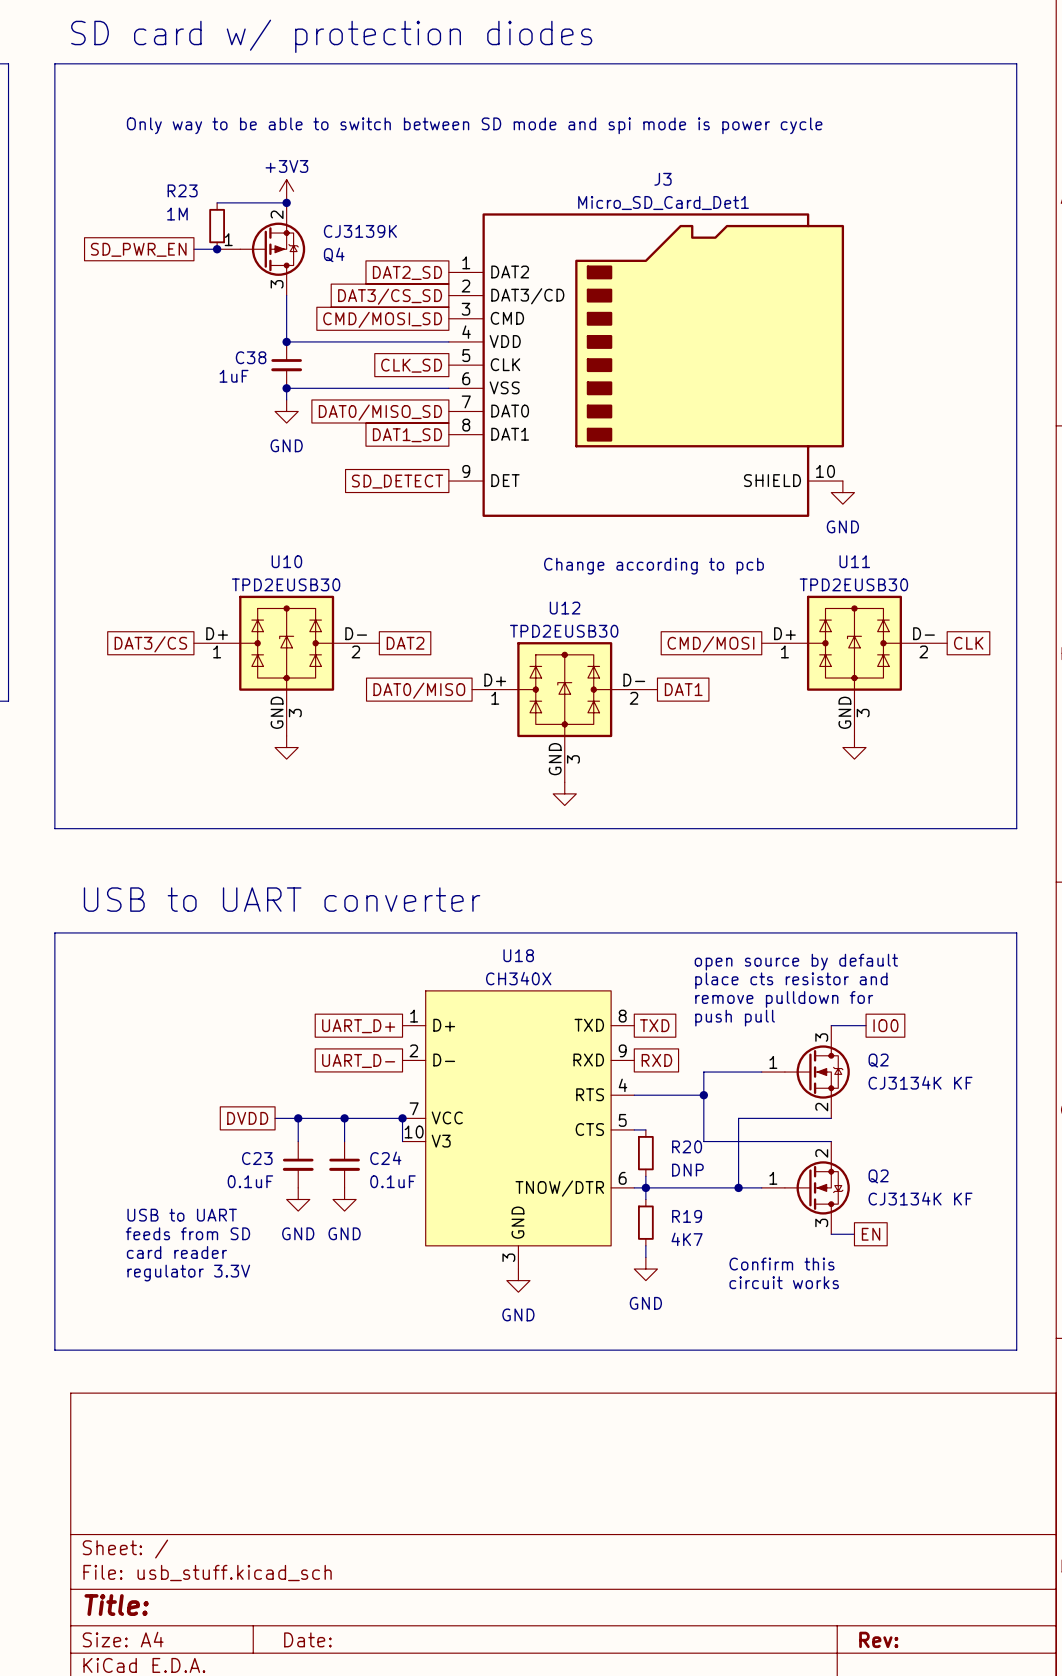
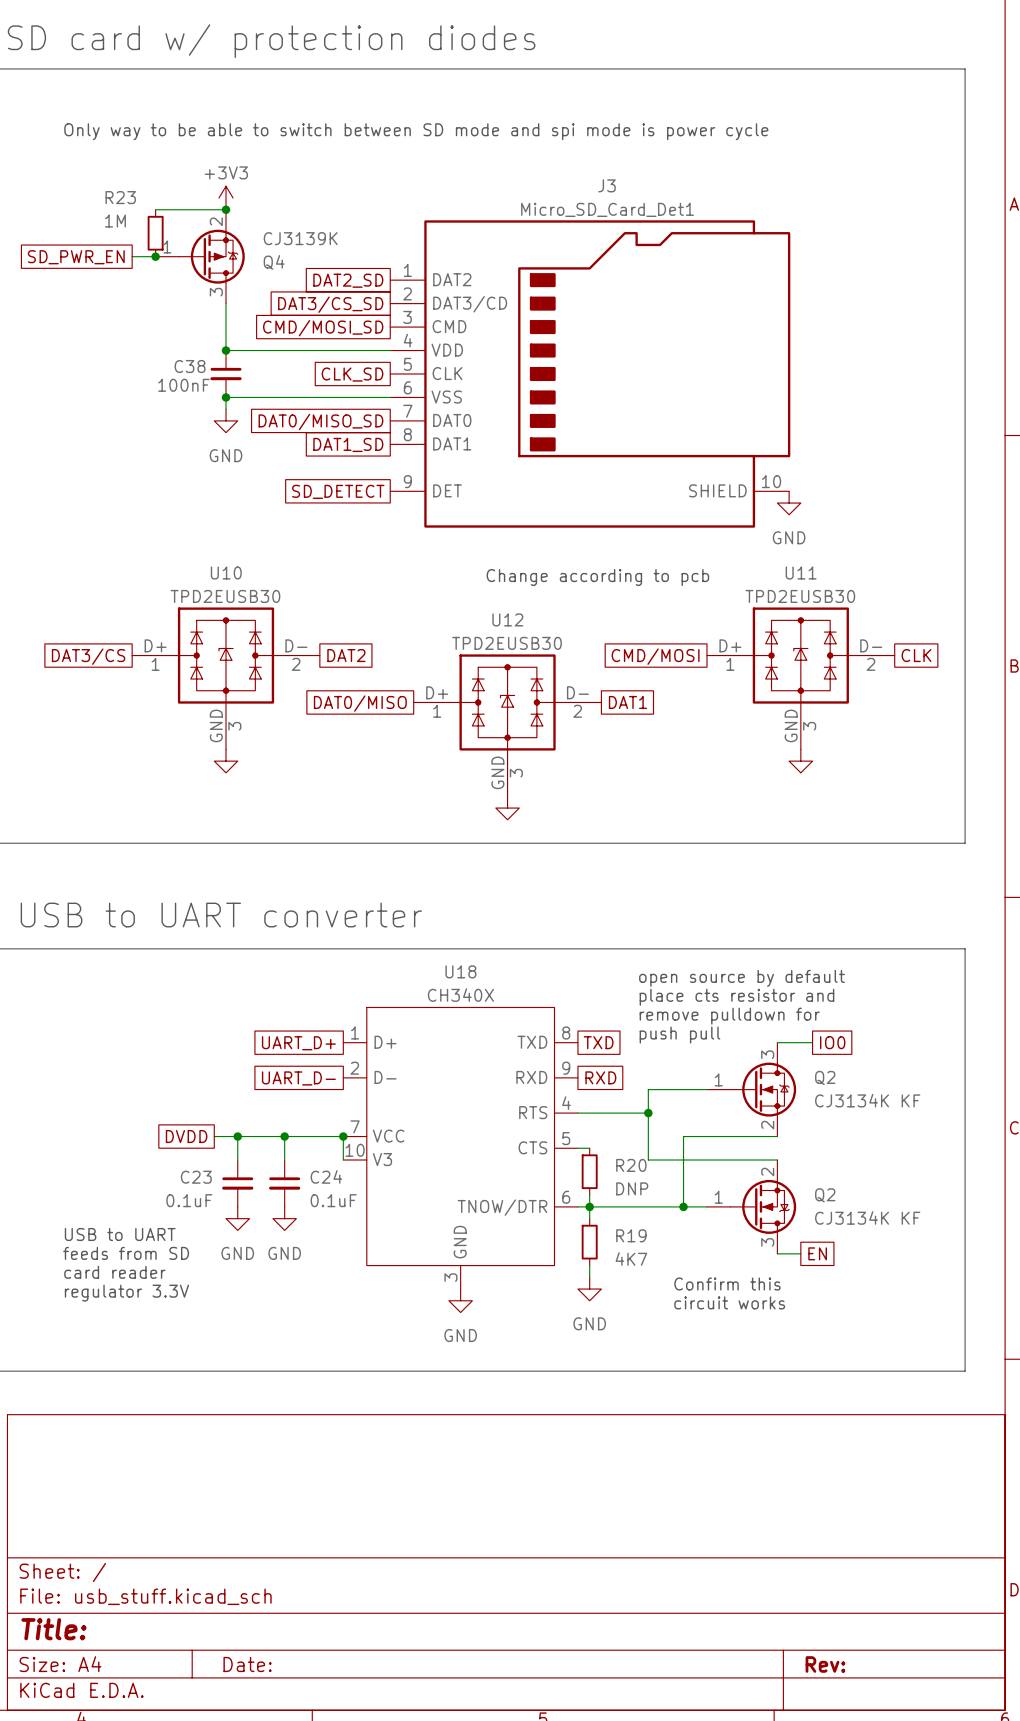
C38 value: 1uF (234, 376) -> 100nF (183, 385)

